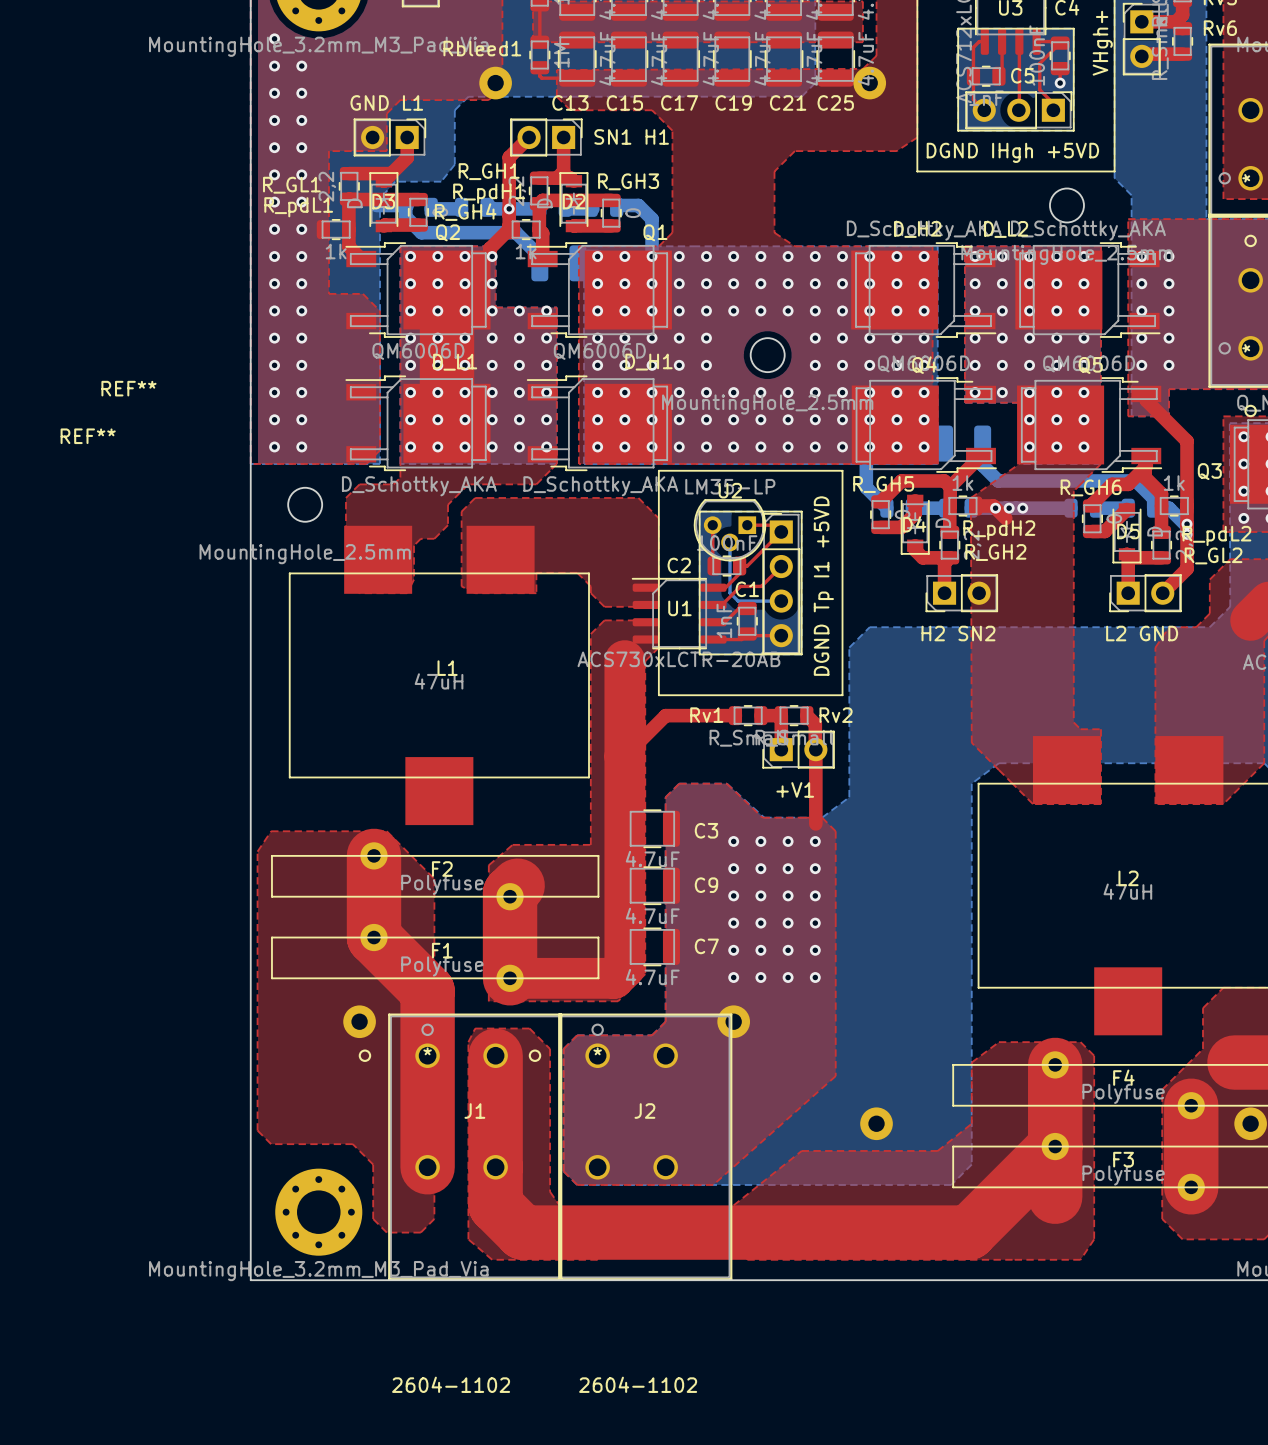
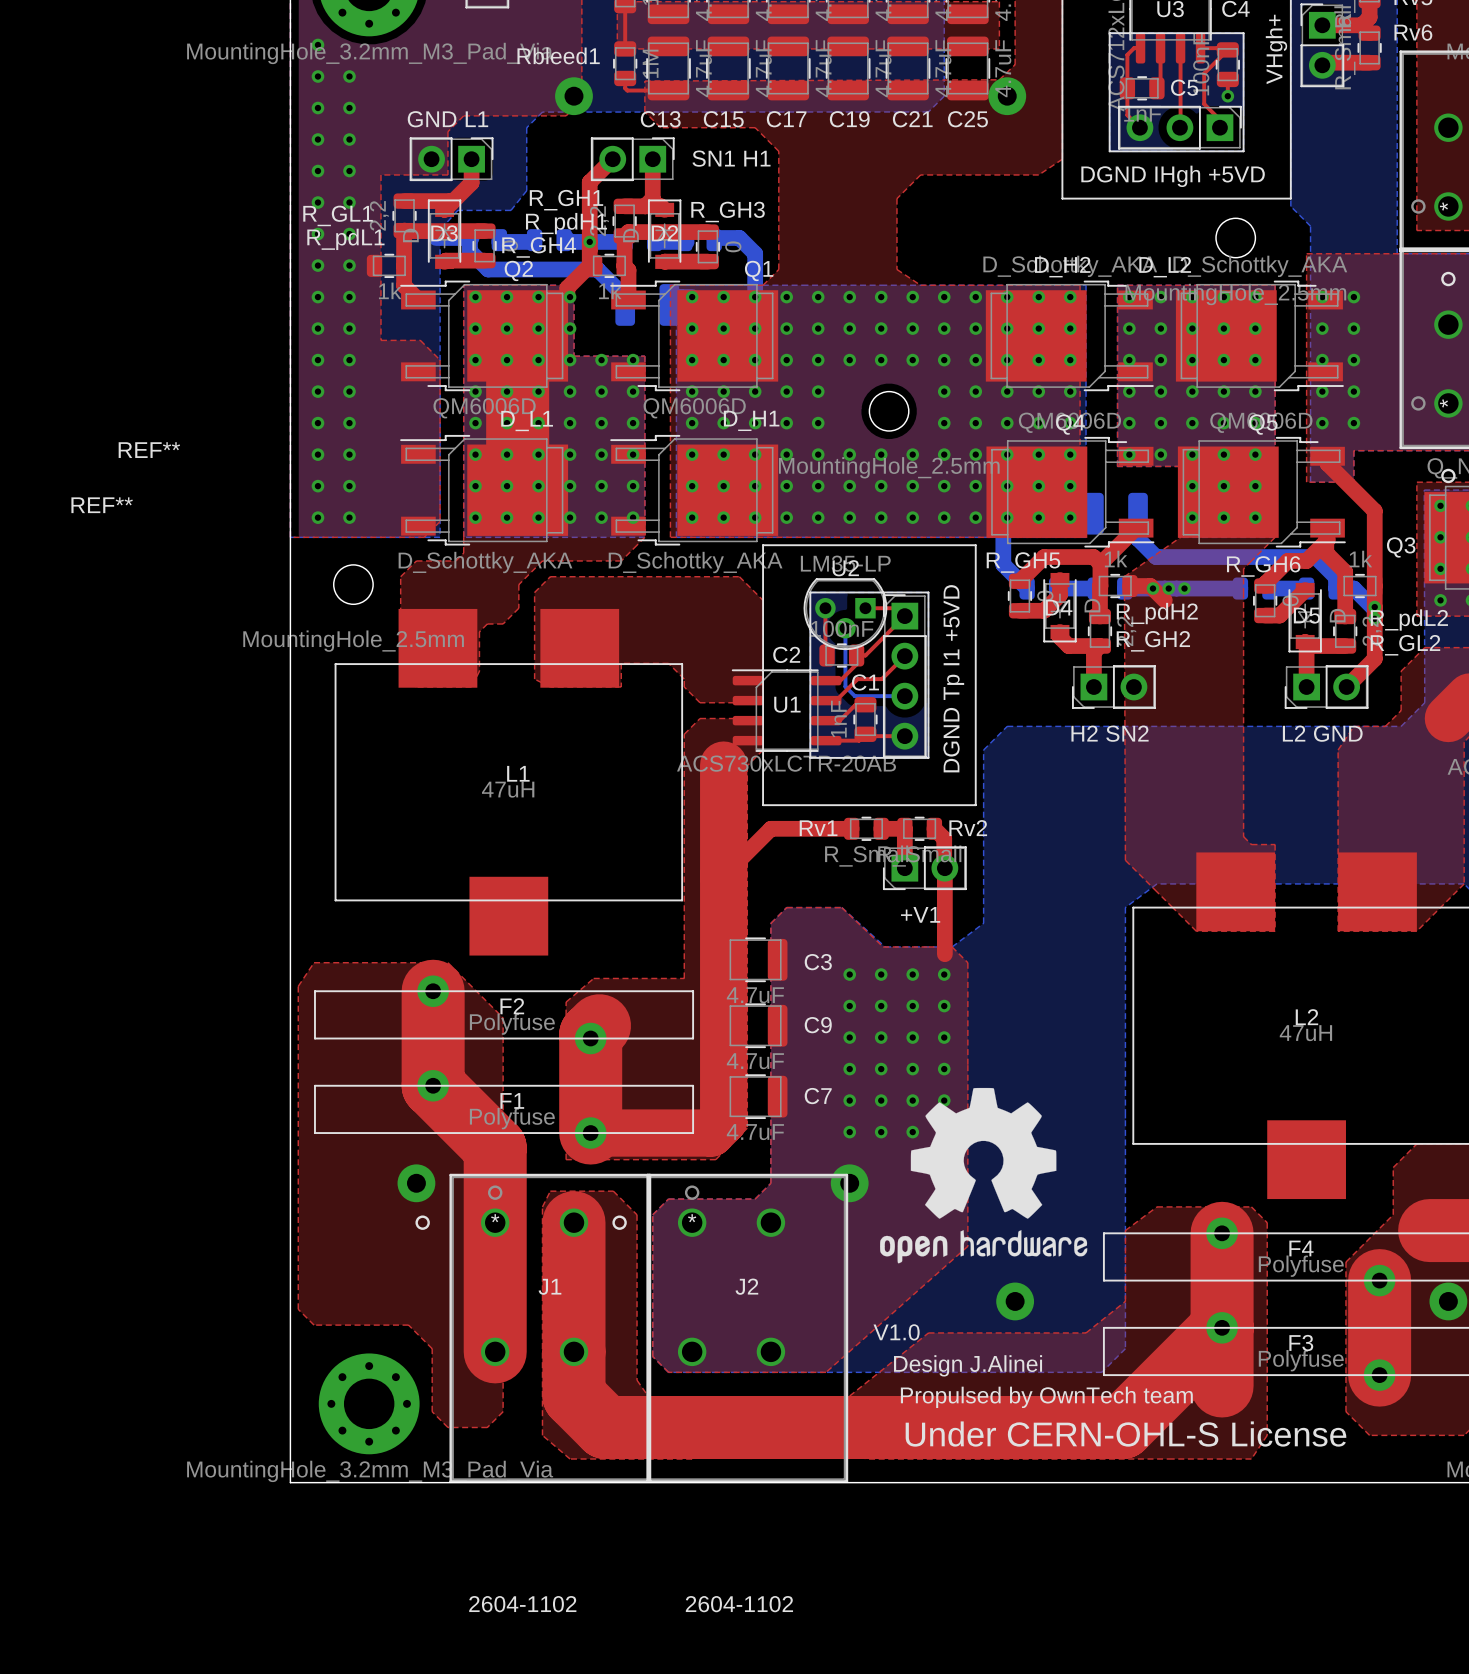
drawing: none -> [880, 1087, 1088, 1264]
text: none -> V1.0 (896, 1332)
text: none -> Design J.Alinei (968, 1365)
text: none -> Propulsed by OwnTech team (1046, 1397)
text: none -> Under CERN-OHL-S License (1125, 1434)

